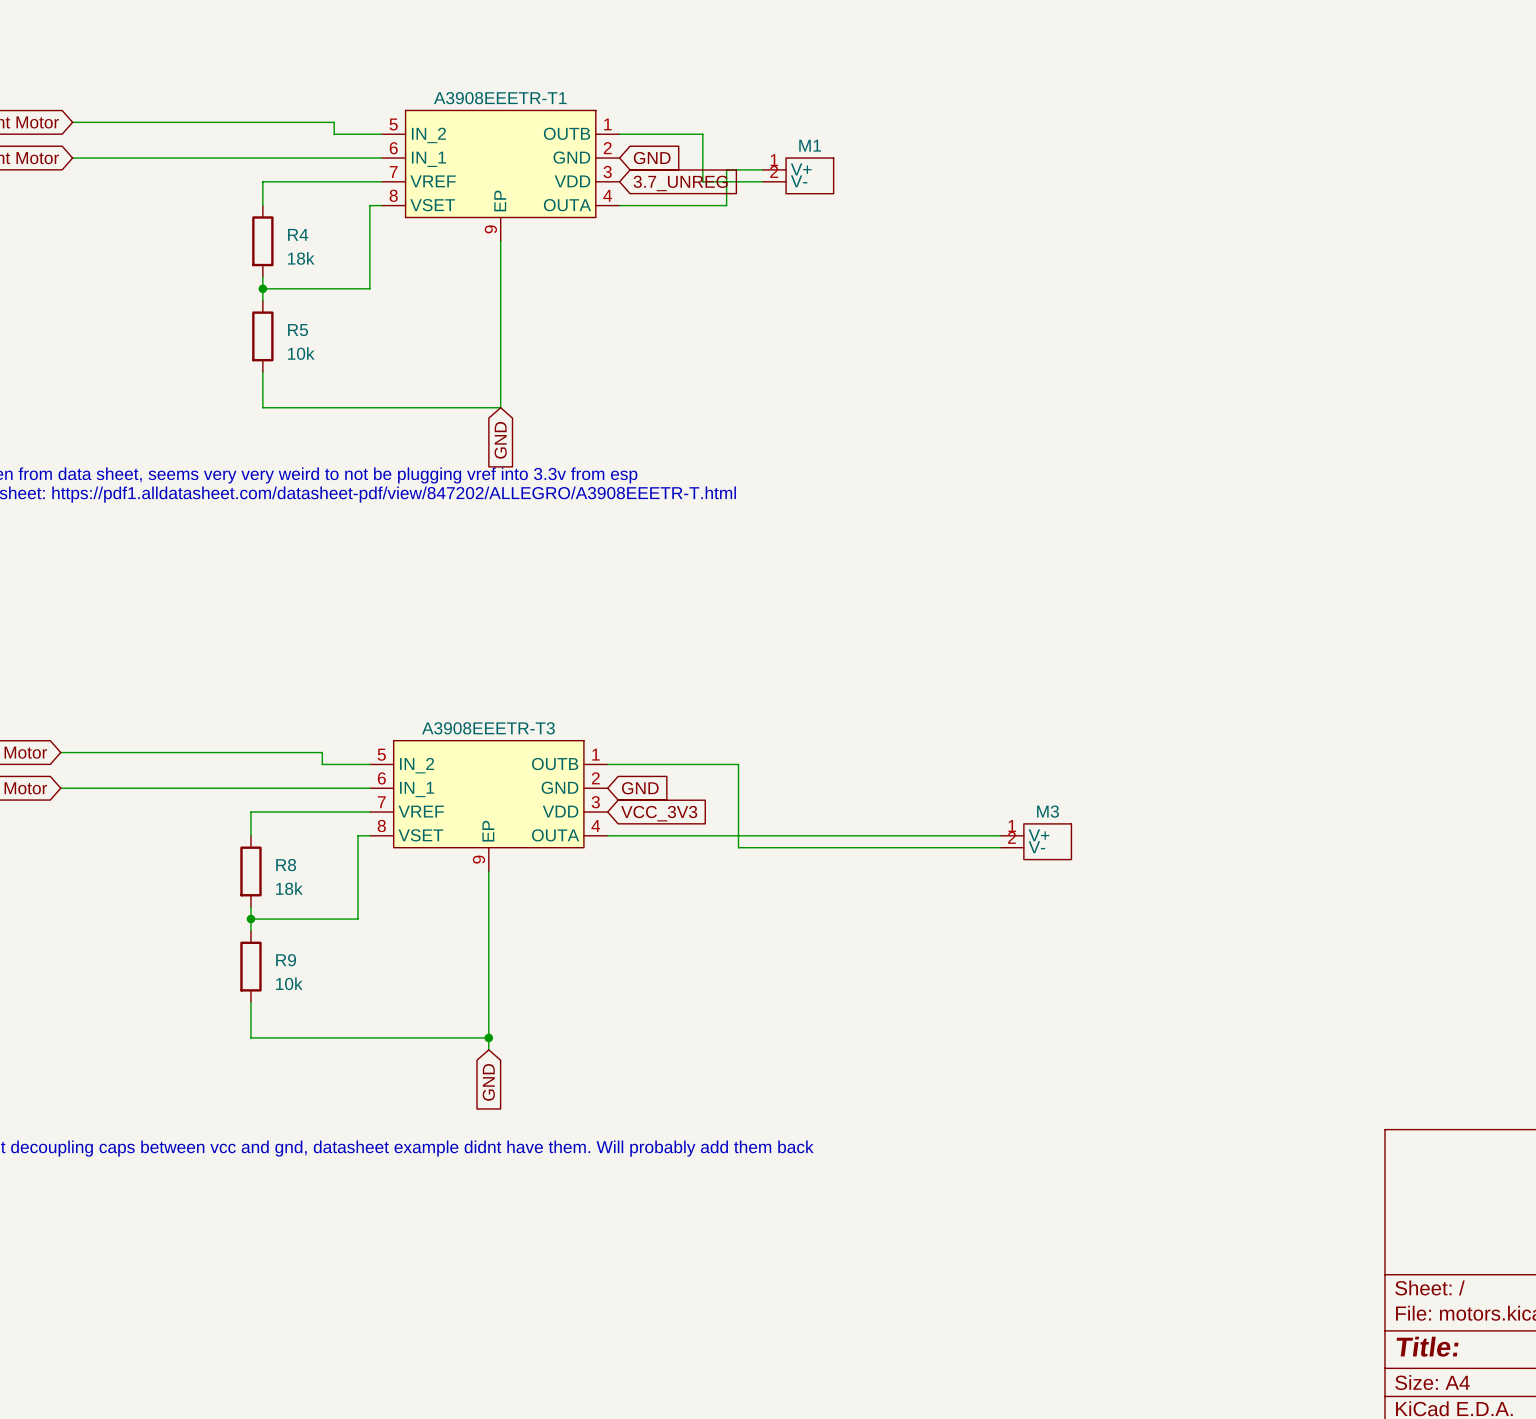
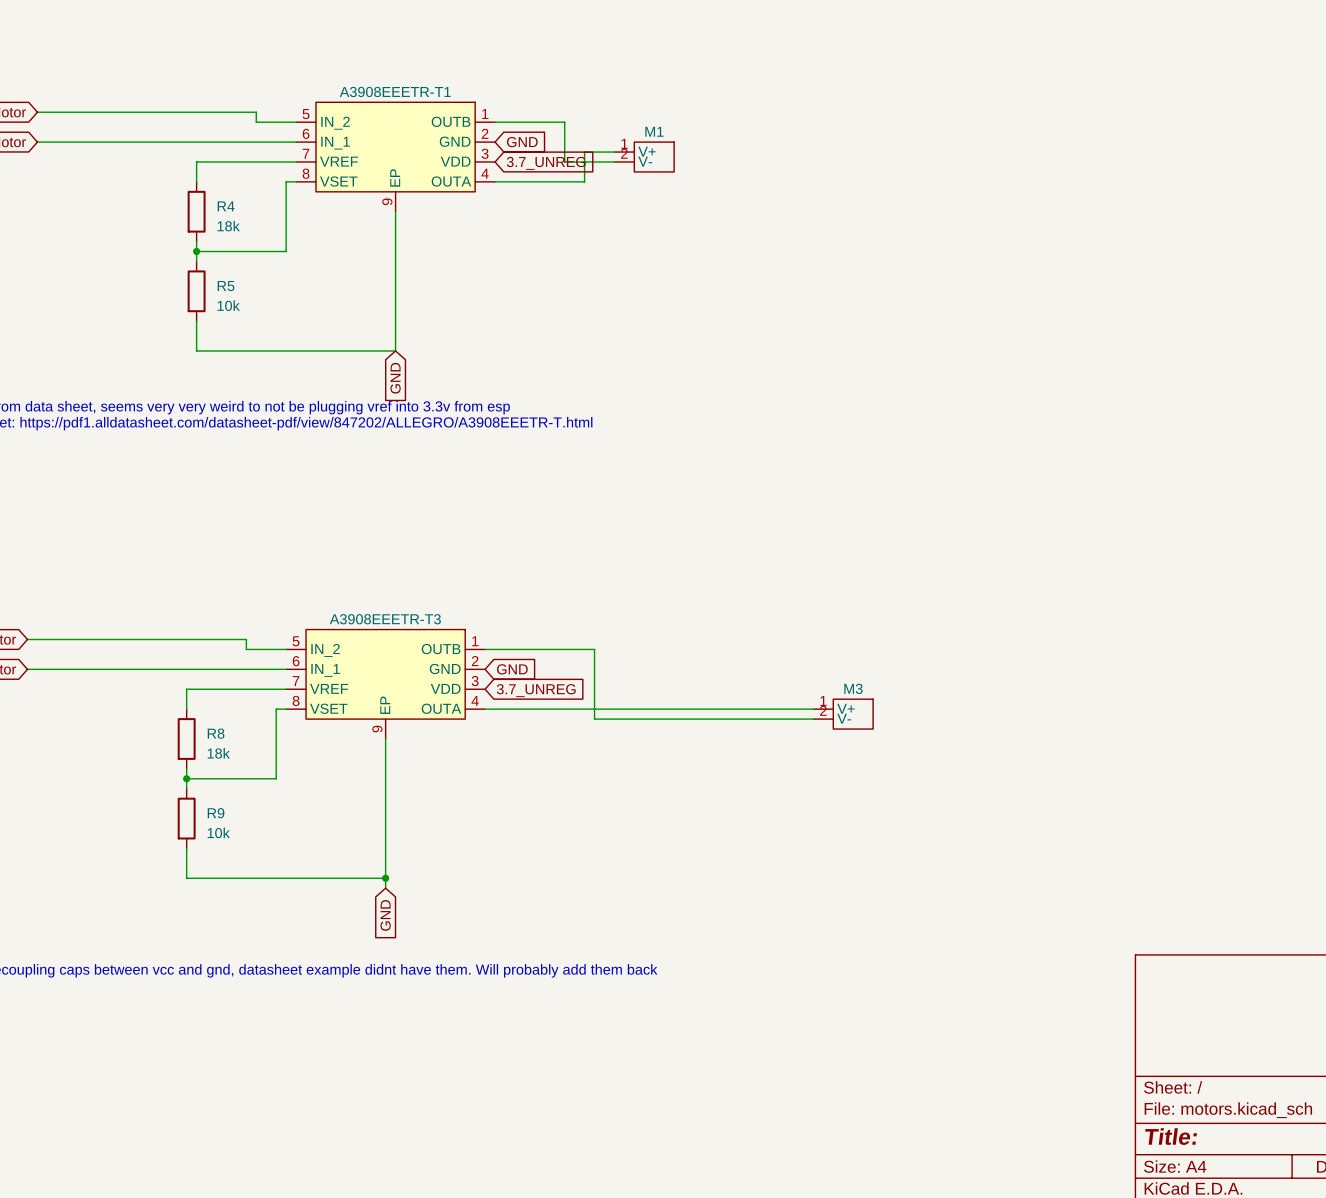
global label: VCC_3V3 (659, 813) -> 3.7_UNREG (536, 690)

